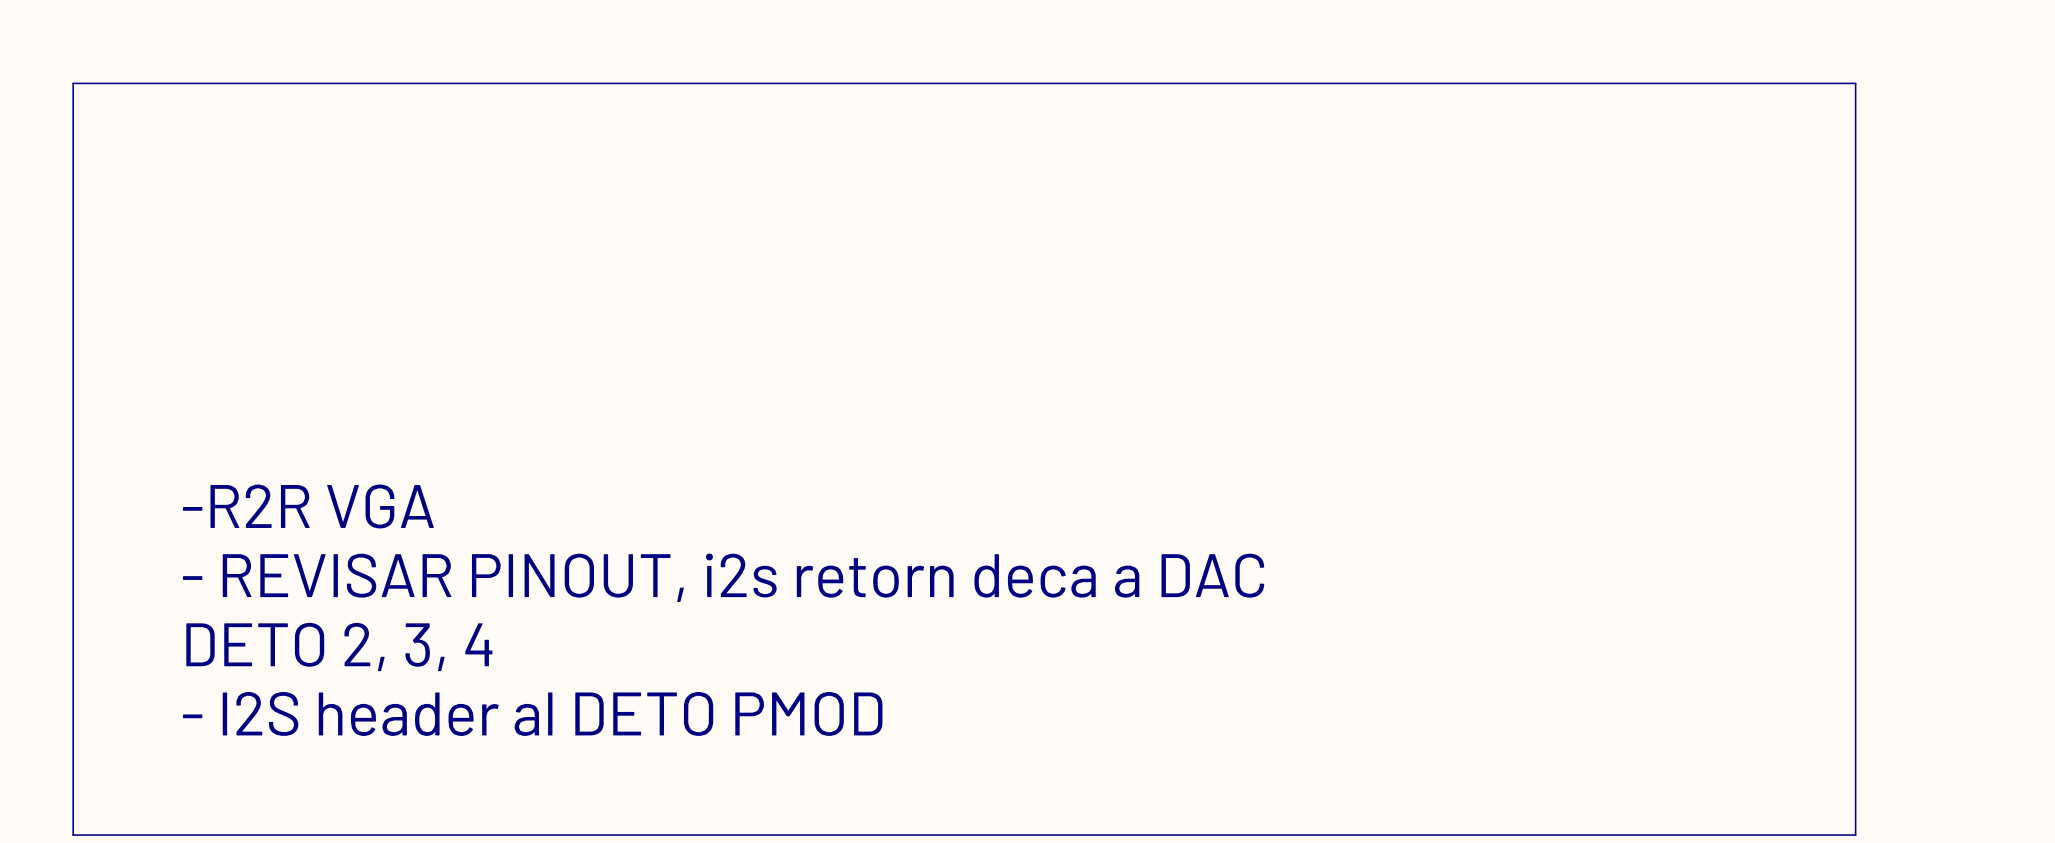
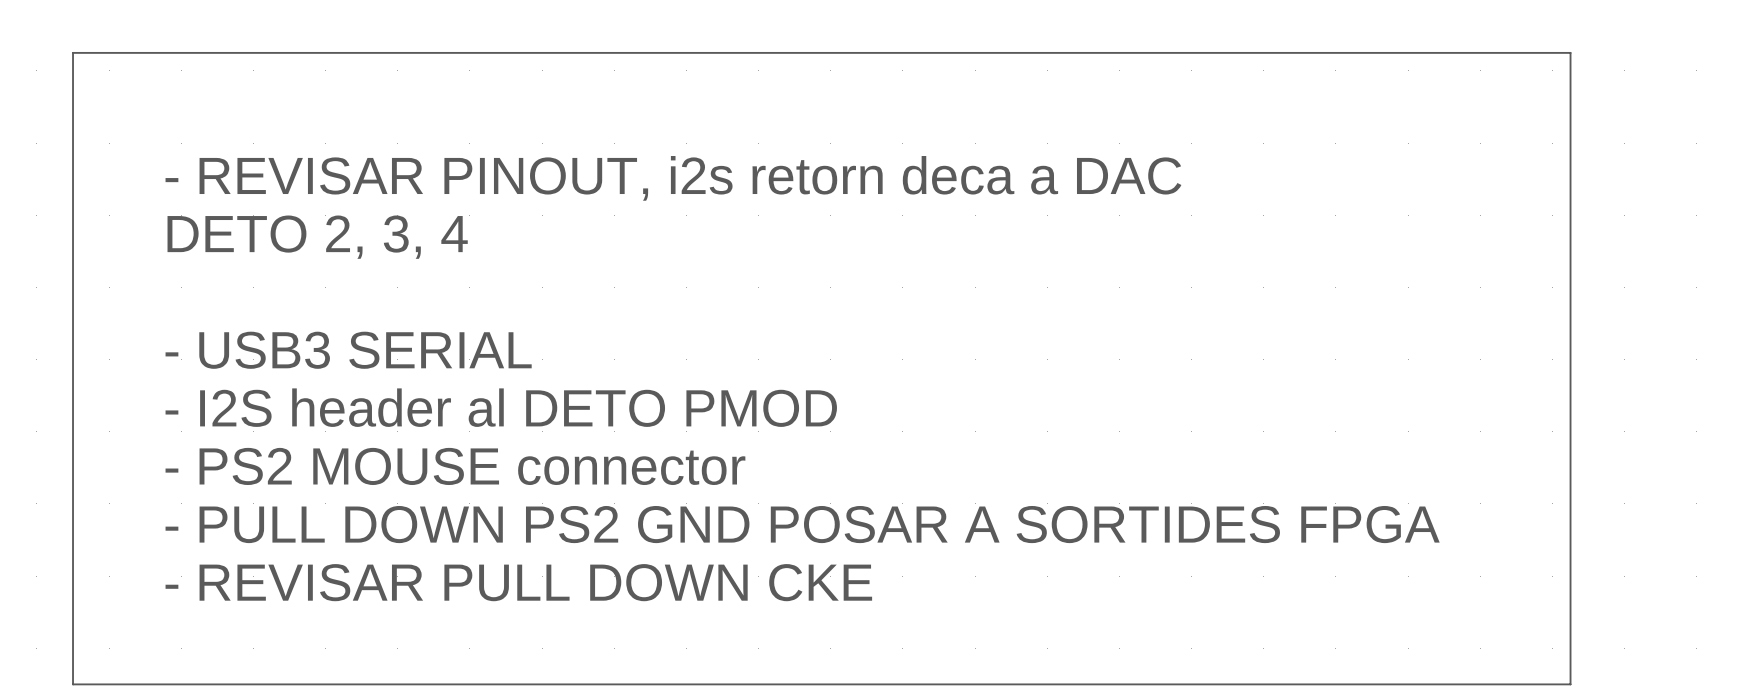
text: none -> - REVISAR PINOUT, i2s retorn deca a DAC (673, 178)
text: none -> DETO 2, 3, 4 (317, 237)
text: none -> - USB3 SERIAL (348, 350)
text: -R2R VGA (308, 506) -> - I2S header al DETO PMOD (501, 407)
text: - REVISAR PINOUT, i2s retorn deca a DAC (723, 577) -> - PS2 MOUSE connector (455, 466)
text: DETO 2, 3, 4 (339, 646) -> - PULL DOWN PS2 GND POSAR A SORTIDES FPGA (802, 524)
text: - I2S header al DETO PMOD (532, 713) -> - REVISAR PULL DOWN CKE (518, 582)

